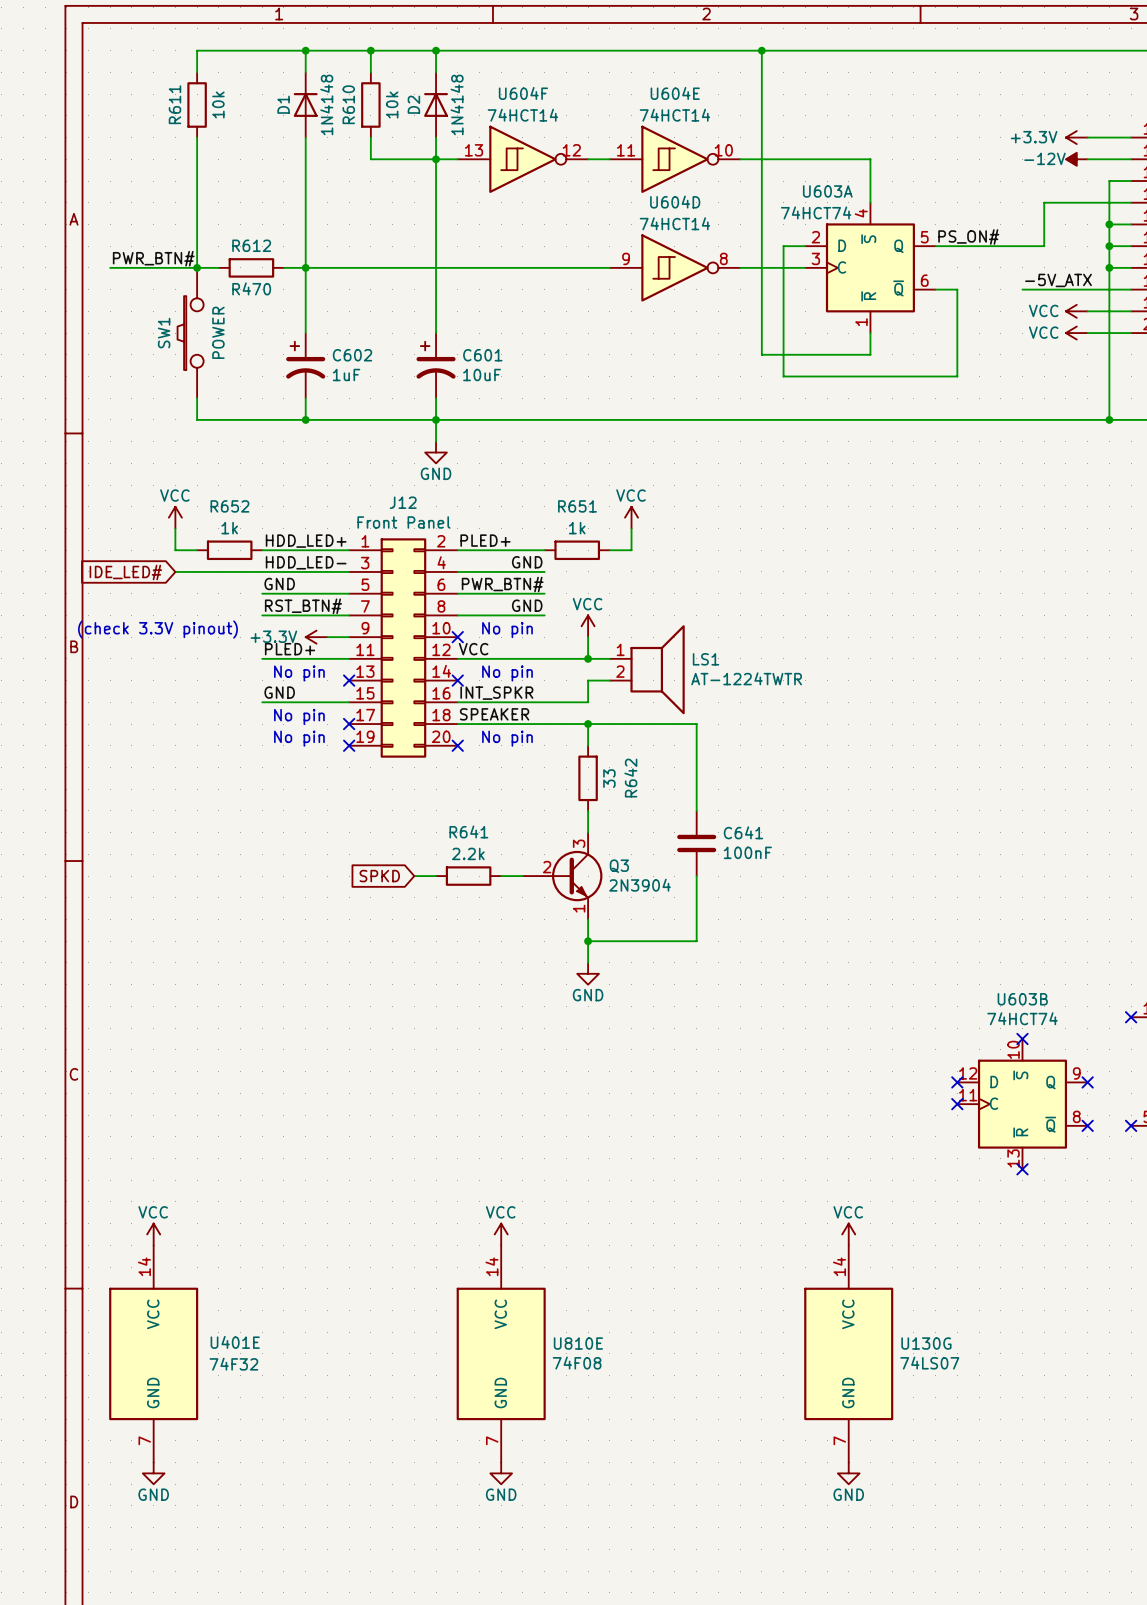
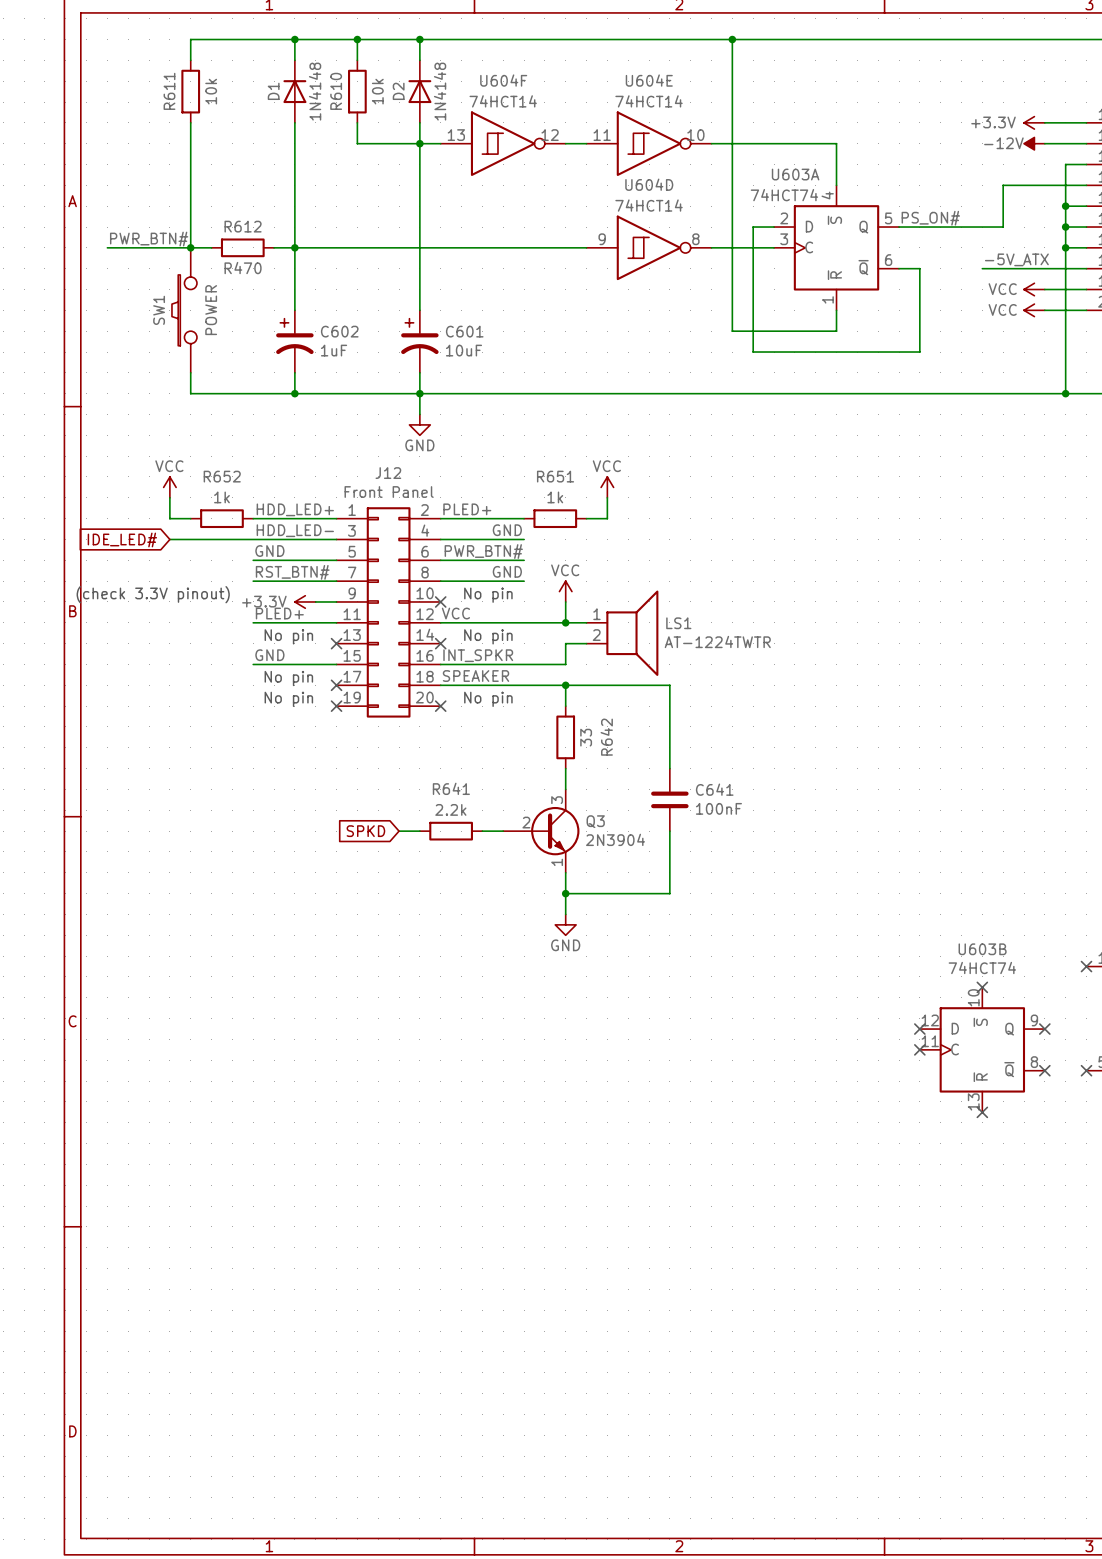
power symbol: VCC (153, 1234) -> none
power symbol: VCC (501, 1234) -> none
power symbol: VCC (848, 1234) -> none
U401E: 74F32 (153, 1353) -> none
U810E: 74F08 (501, 1353) -> none
U130G: 74LS07 (848, 1353) -> none
power symbol: GND (153, 1473) -> none
power symbol: GND (501, 1473) -> none
power symbol: GND (848, 1473) -> none

